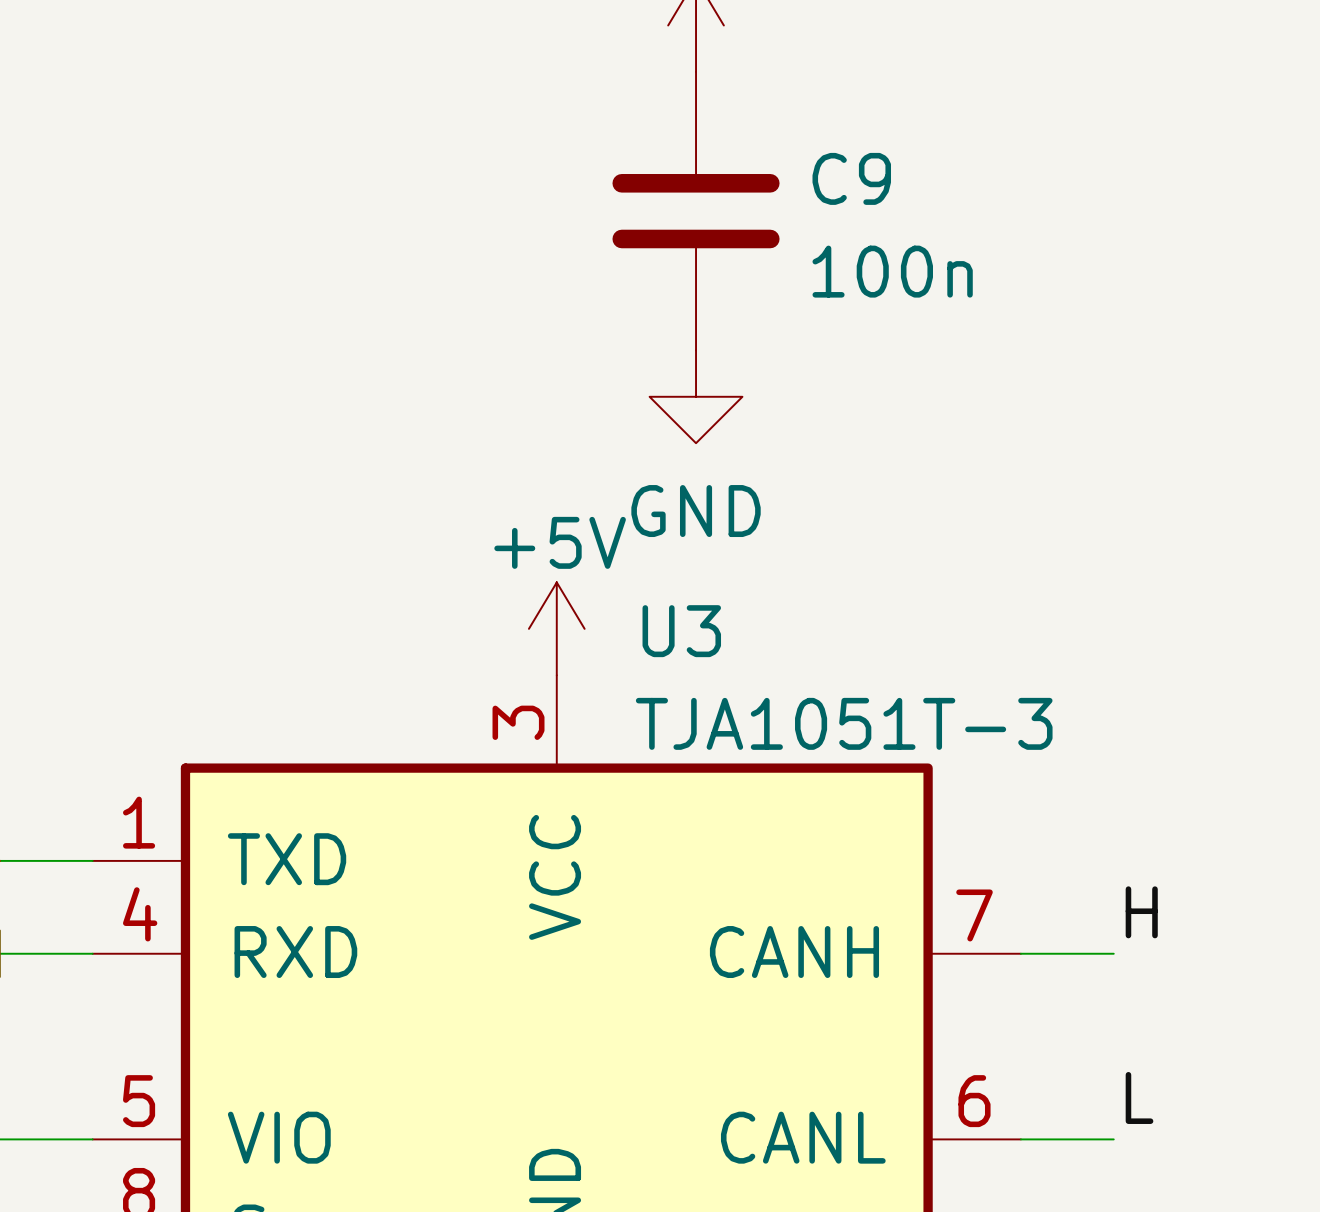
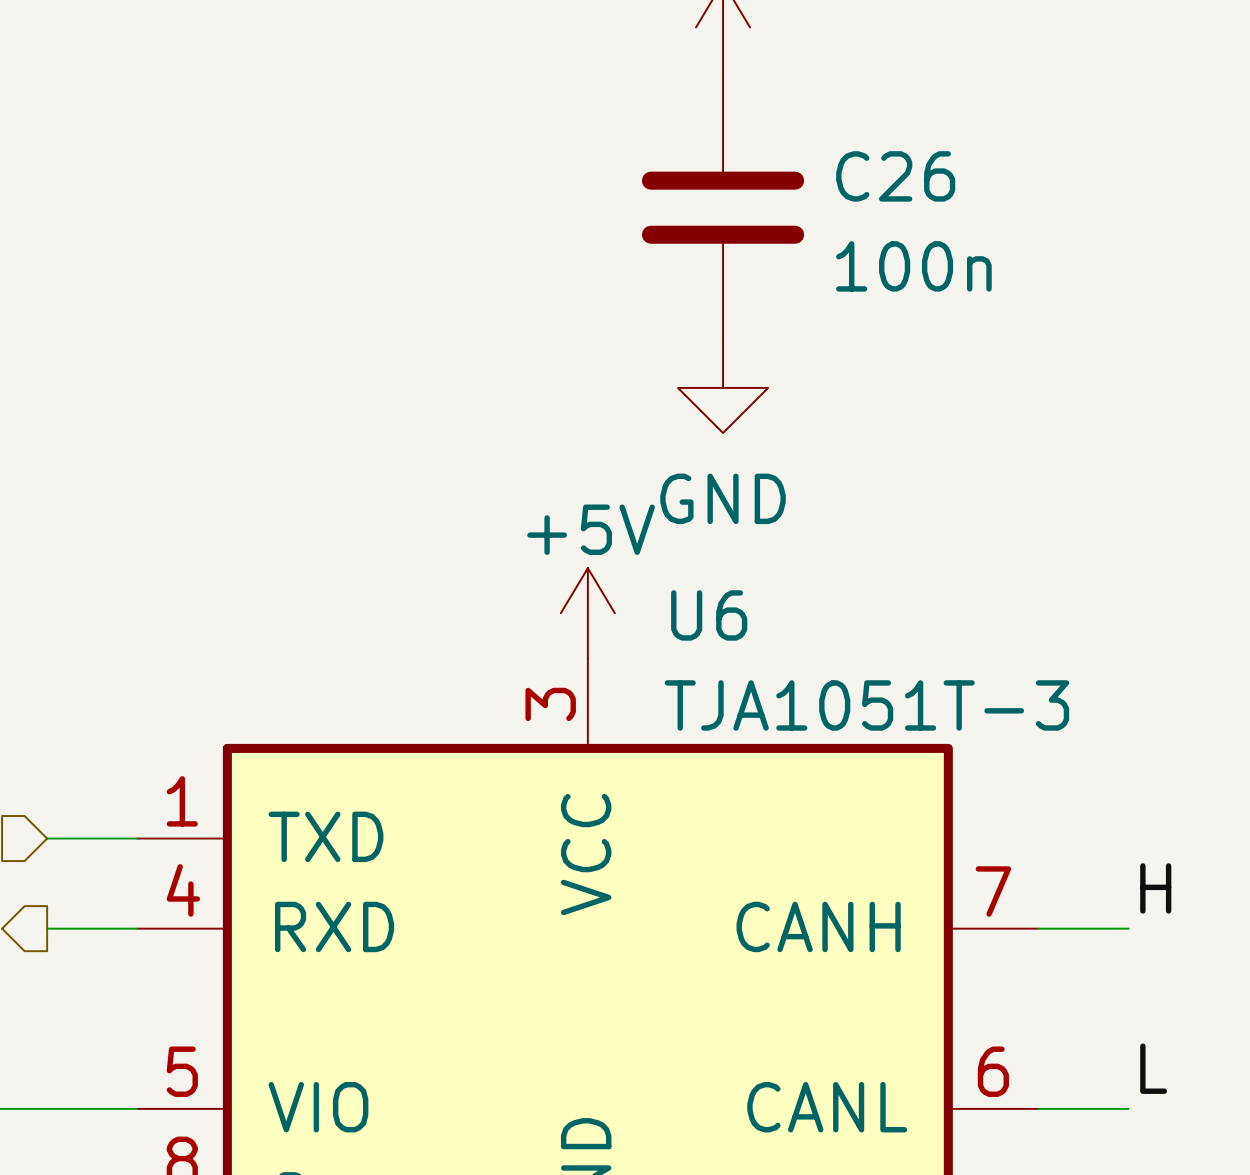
C9 name: C9 (851, 178) -> C26 (895, 176)
U3 name: U3 (681, 631) -> U6 (709, 615)

